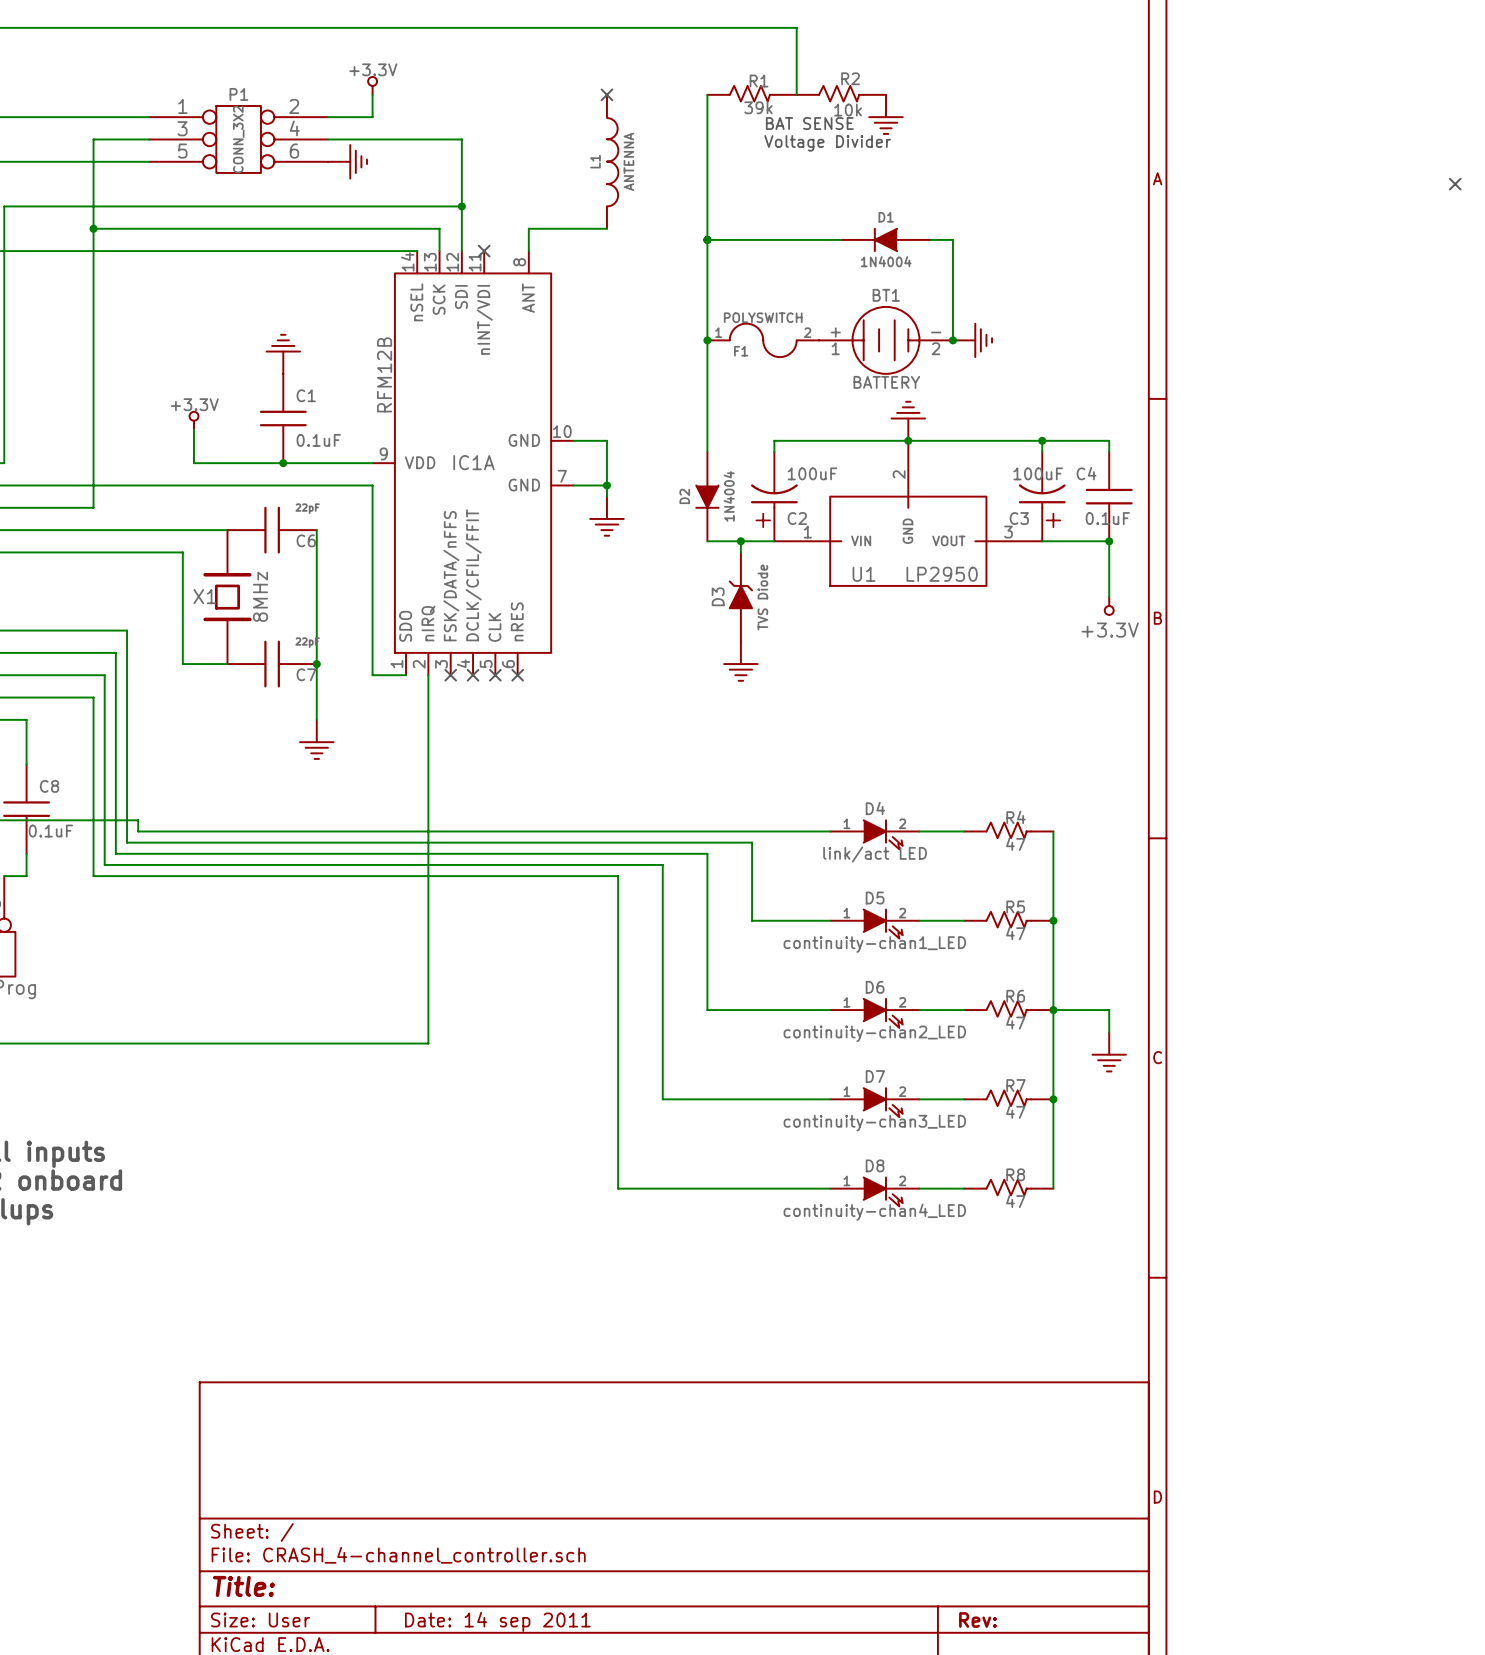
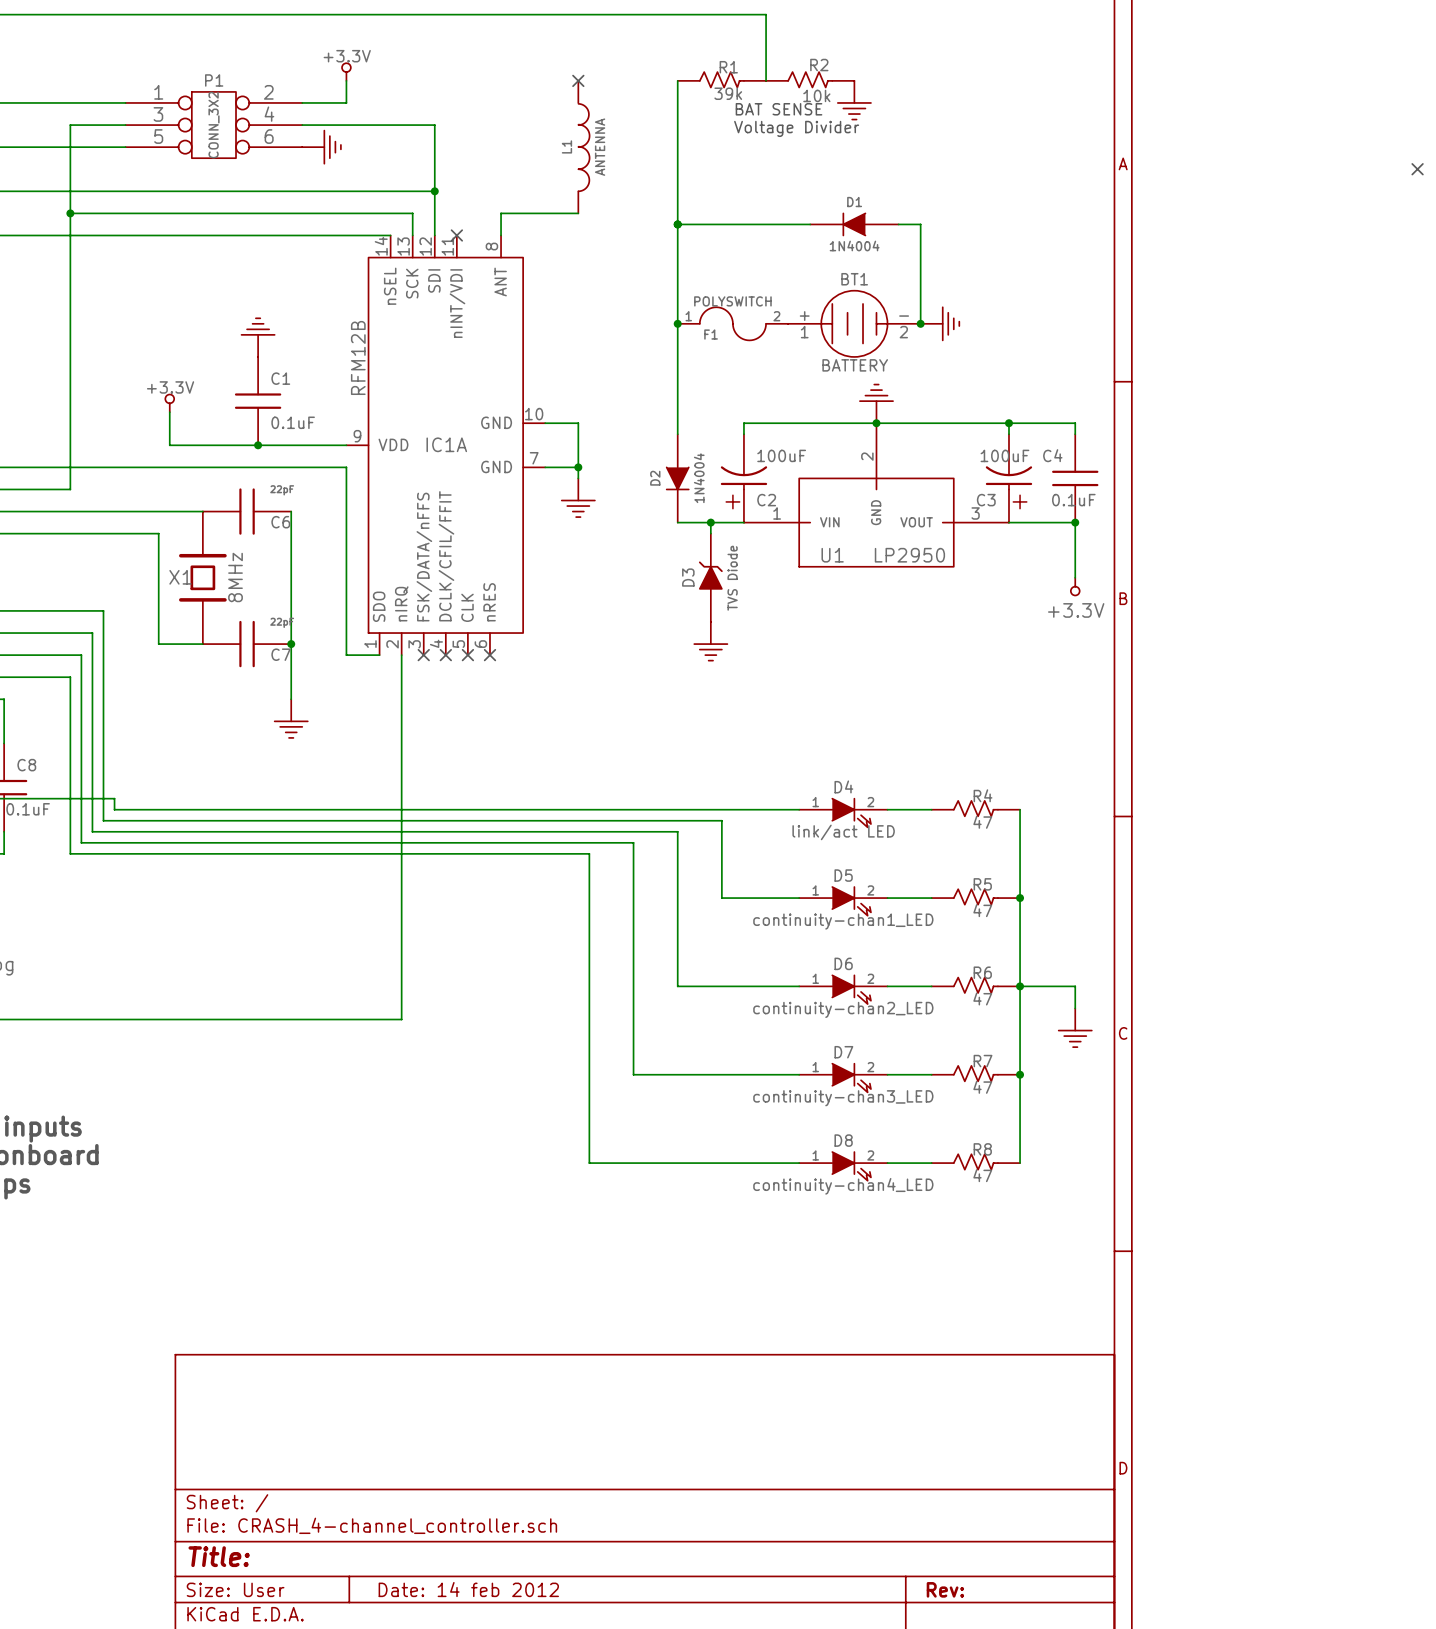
title block: Date: 14 sep 2011 (497, 1621) -> Date: 14 feb 2012 (468, 1589)

